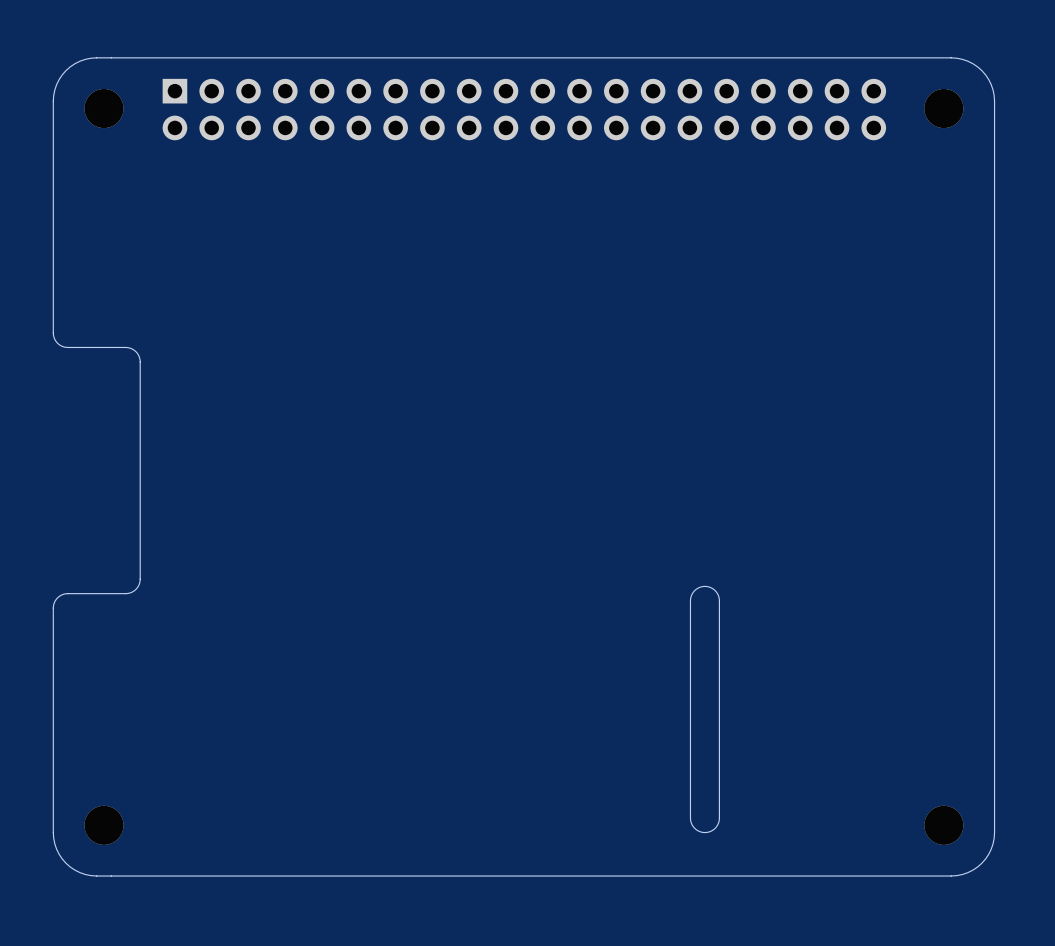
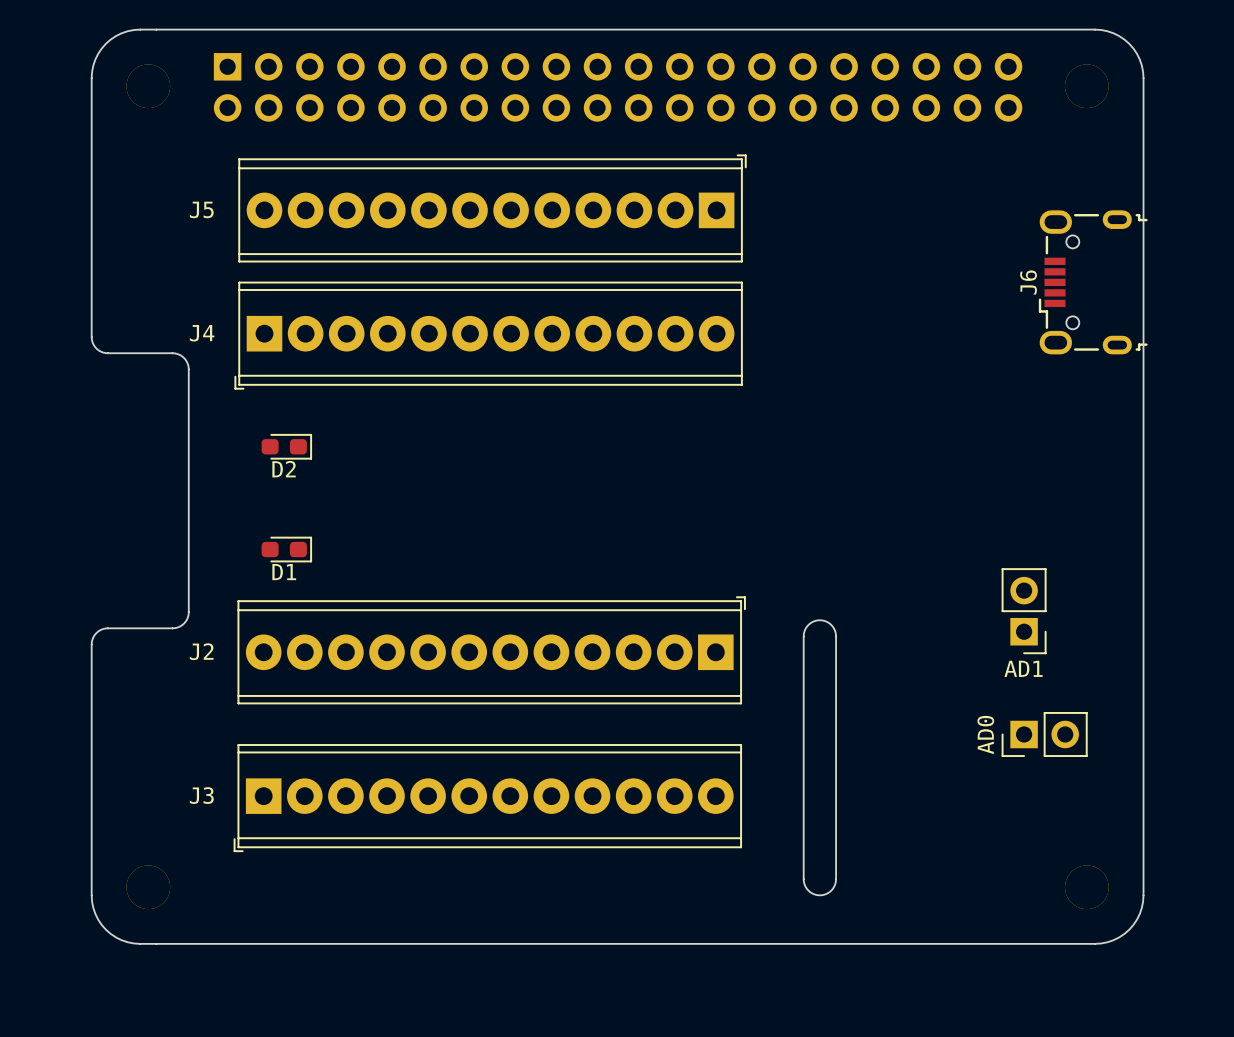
J5: none -> (492, 208)
J6: none -> (1093, 282)
J4: none -> (488, 335)
D2: none -> (286, 446)
D1: none -> (286, 549)
AD1: none -> (1024, 611)
J2: none -> (491, 650)
AD0: none -> (1044, 734)
J3: none -> (487, 798)

